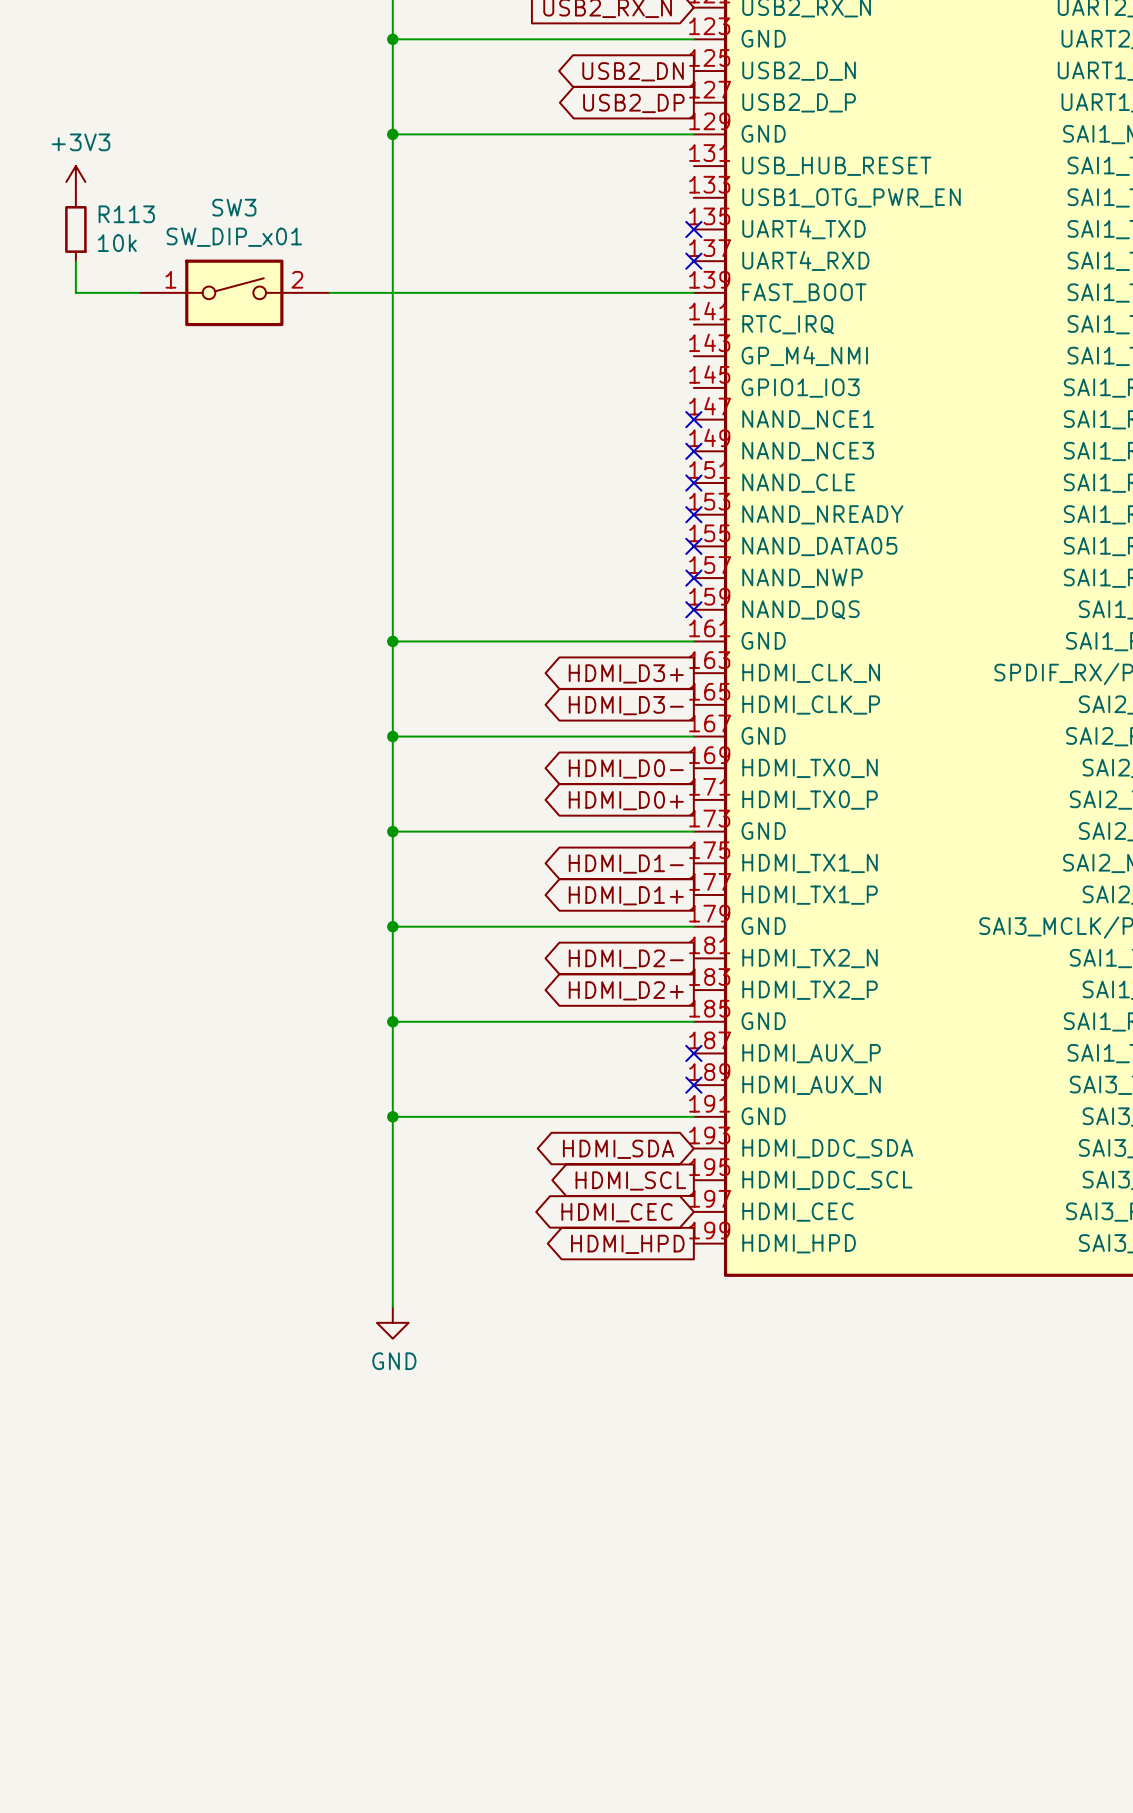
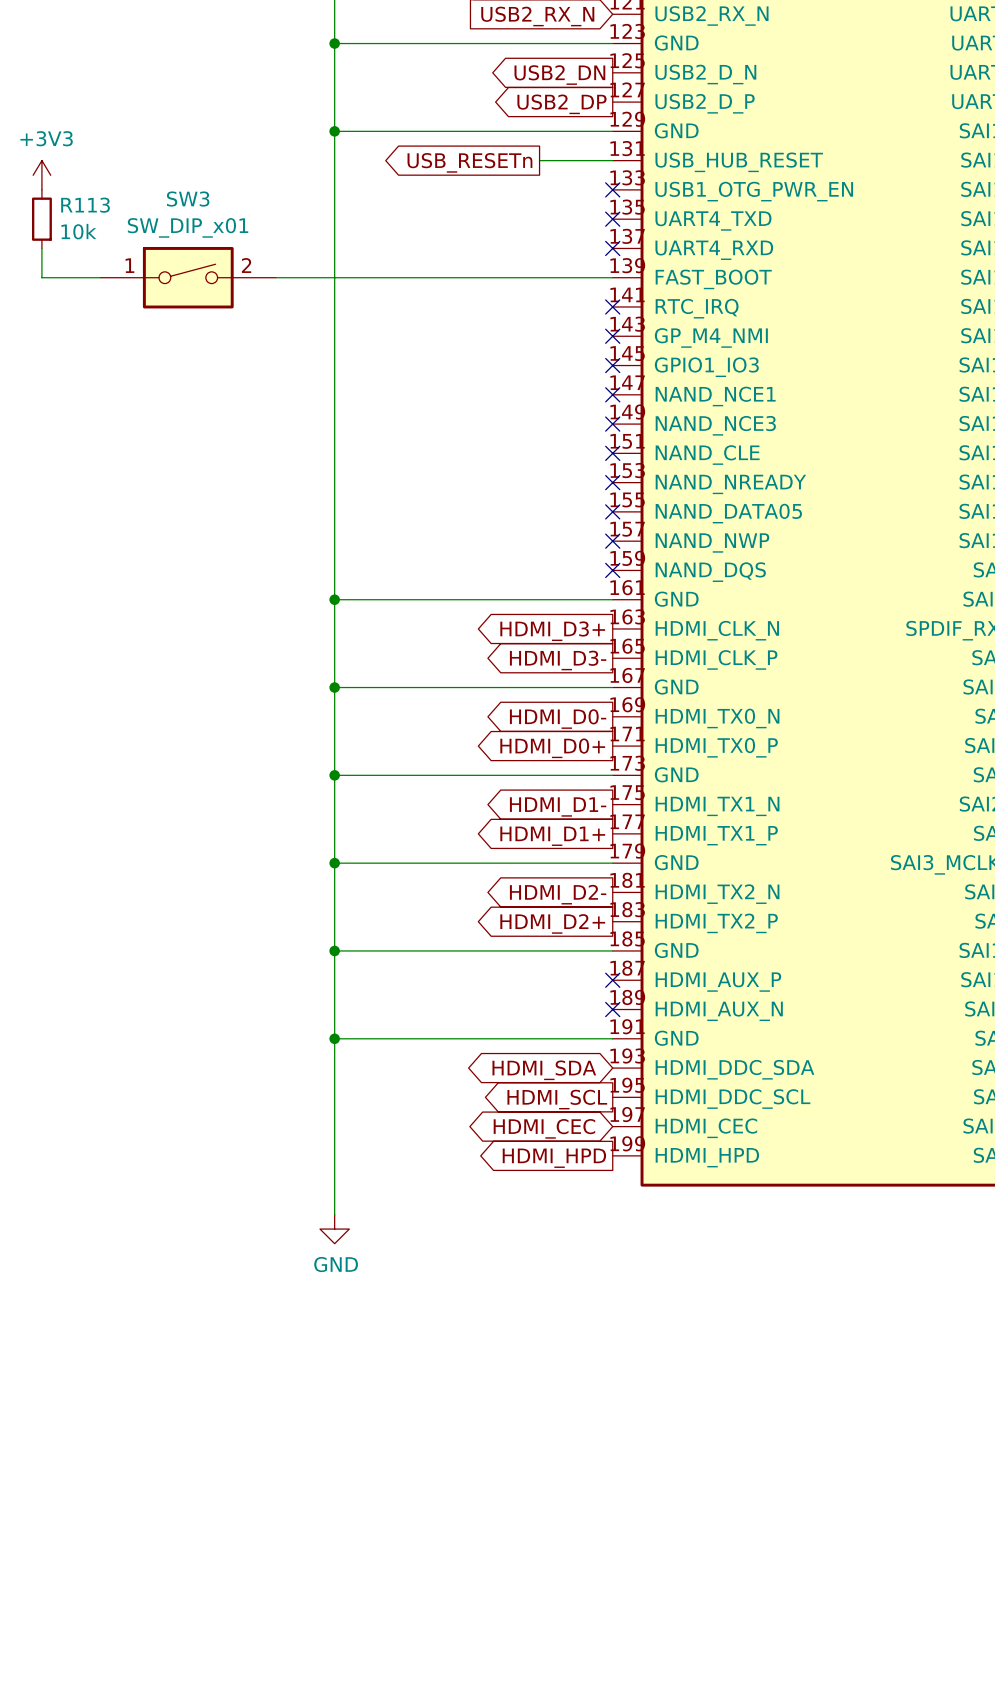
global label: none -> USB_RESETn (469, 162)
wire: none -> (539, 160) (612, 160)
no-connect mark: none -> (612, 189)
no-connect mark: none -> (612, 306)
no-connect mark: none -> (612, 336)
no-connect mark: none -> (612, 365)

